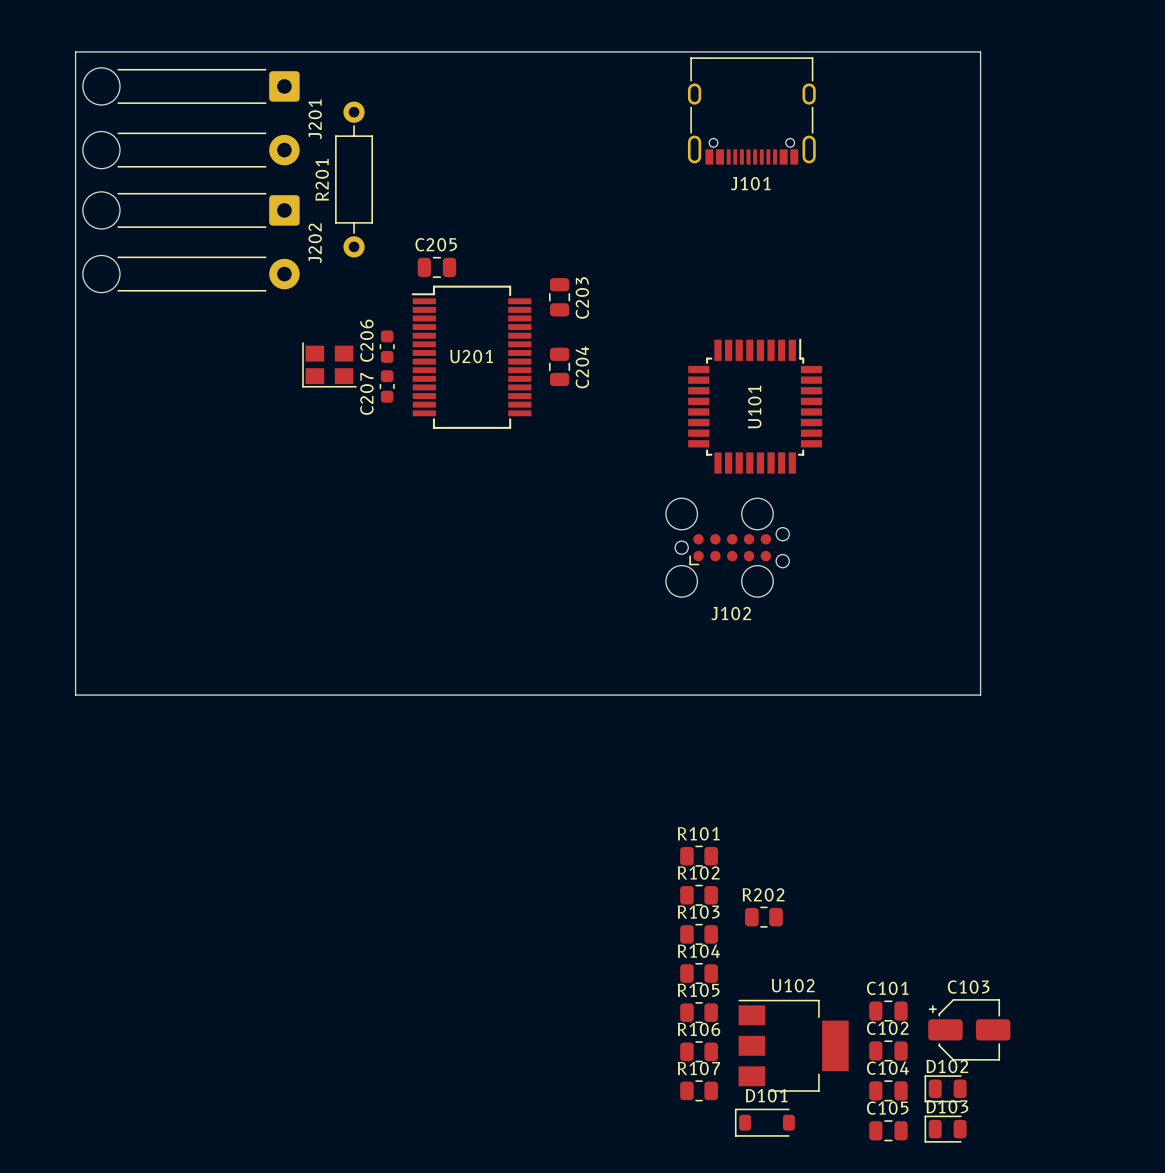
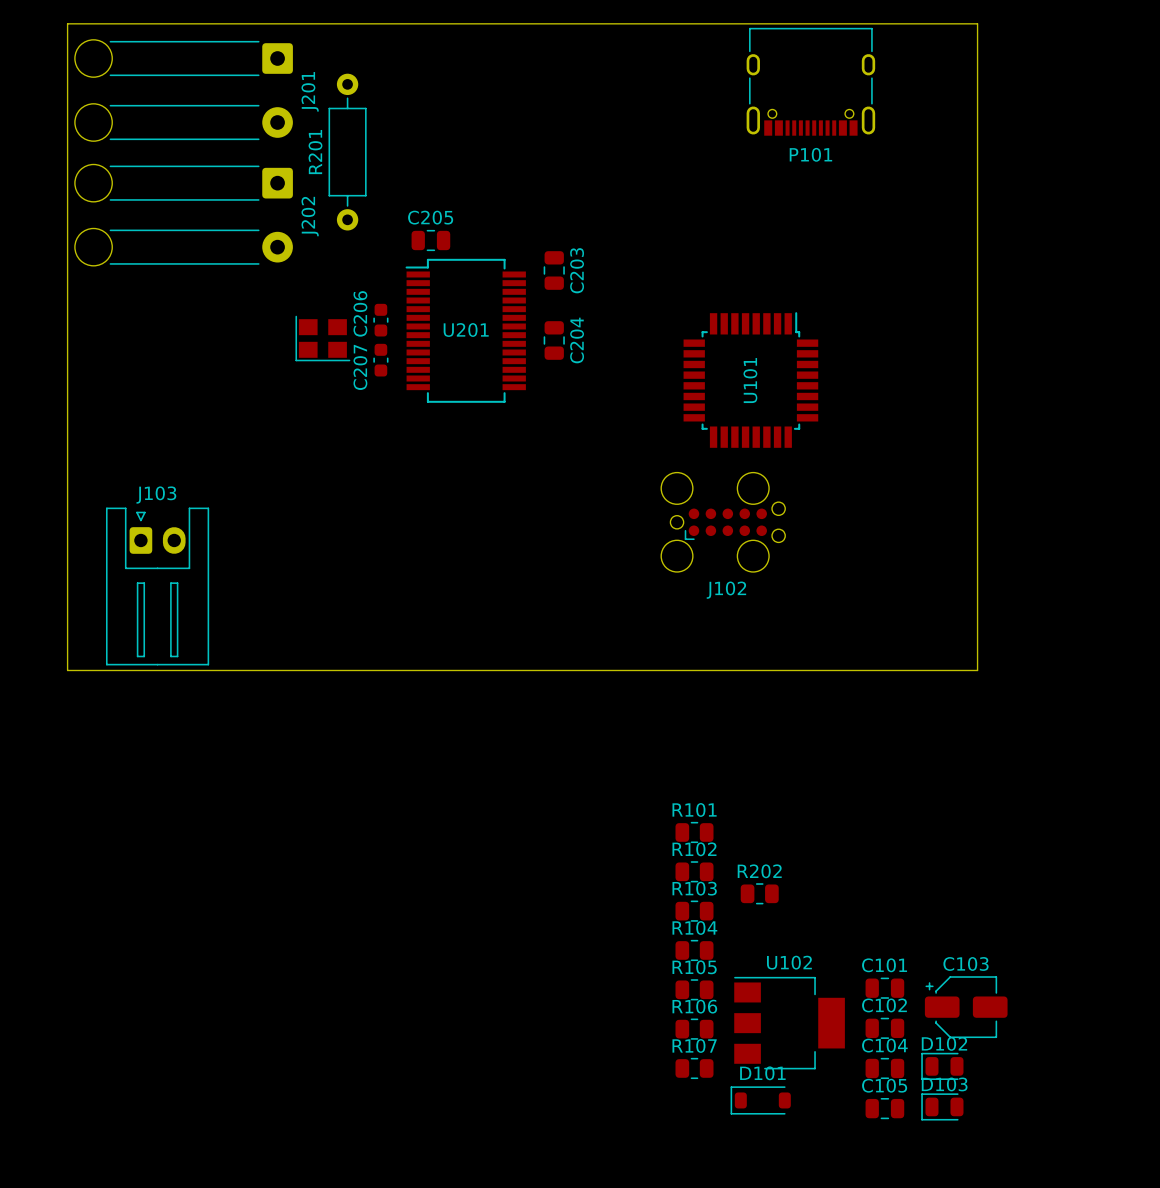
P101: none -> (810, 81)
J101: (751, 110) -> none
J103: none -> (157, 586)

